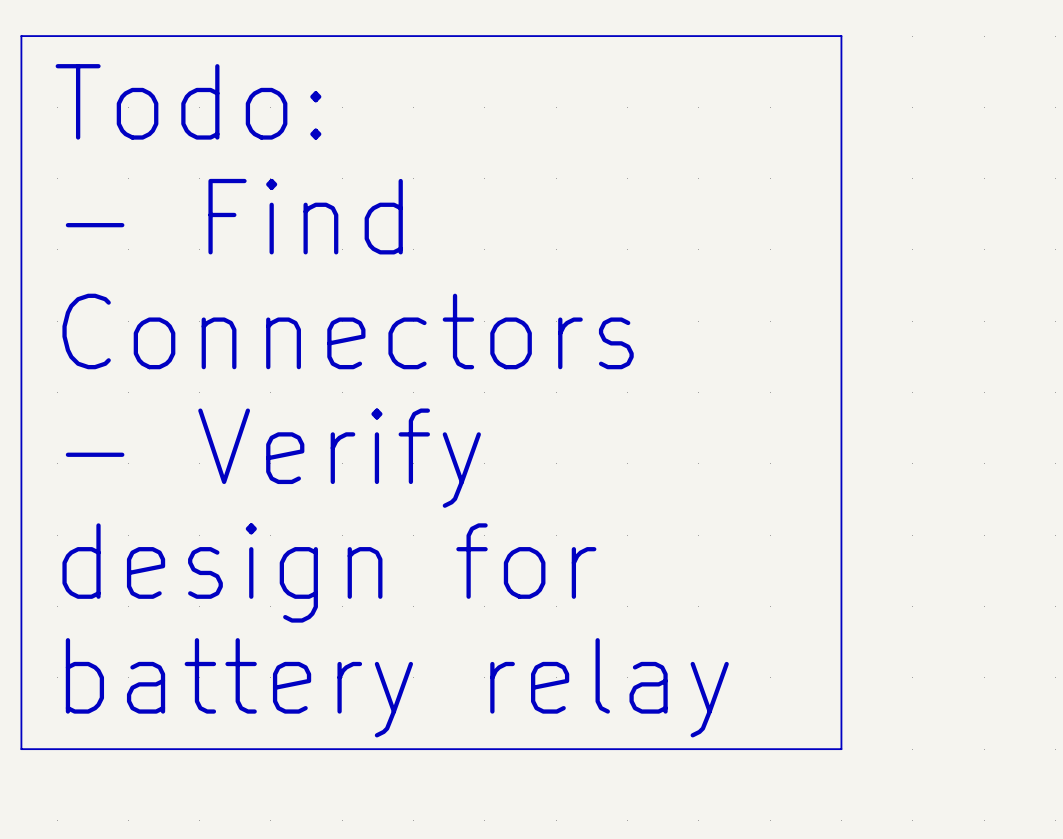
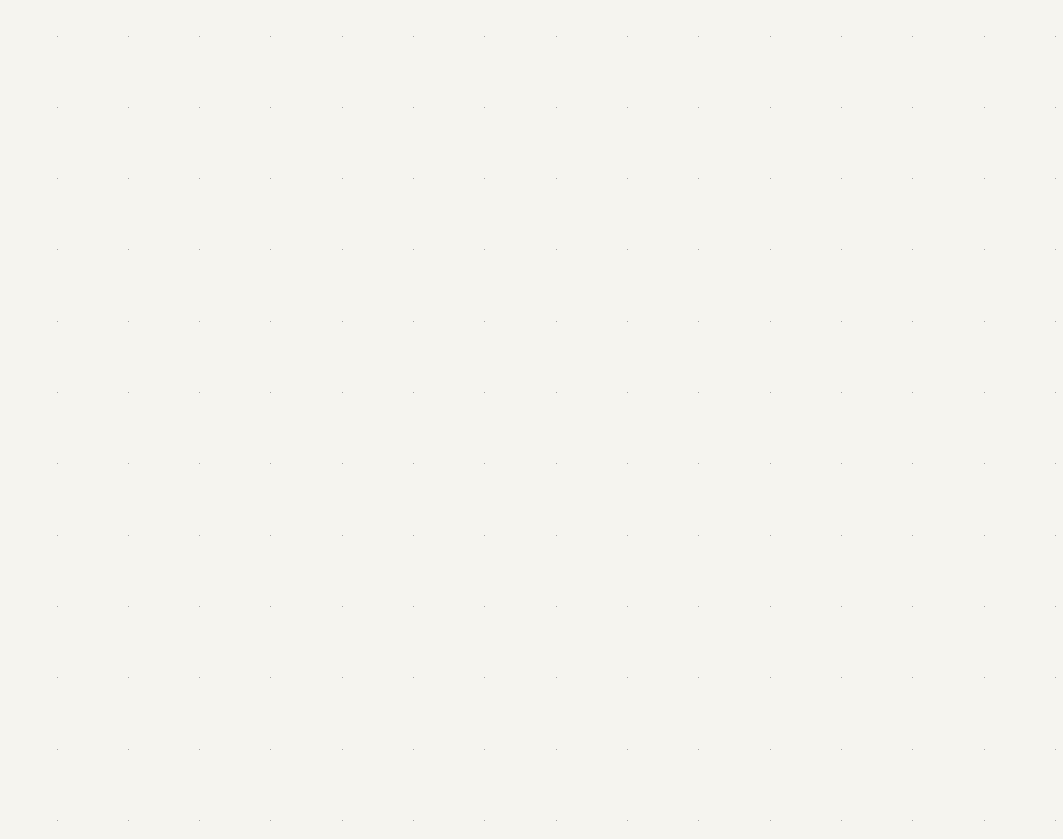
line: (21, 36) (841, 36) (841, 749) (21, 749) (21, 36) -> none
text: Todo: (188, 101) -> none
text: - Find (234, 216) -> none
text: Connectors (348, 331) -> none
text: - Verify (273, 458) -> none
text: design for (329, 572) -> none
text: battery relay (397, 687) -> none

